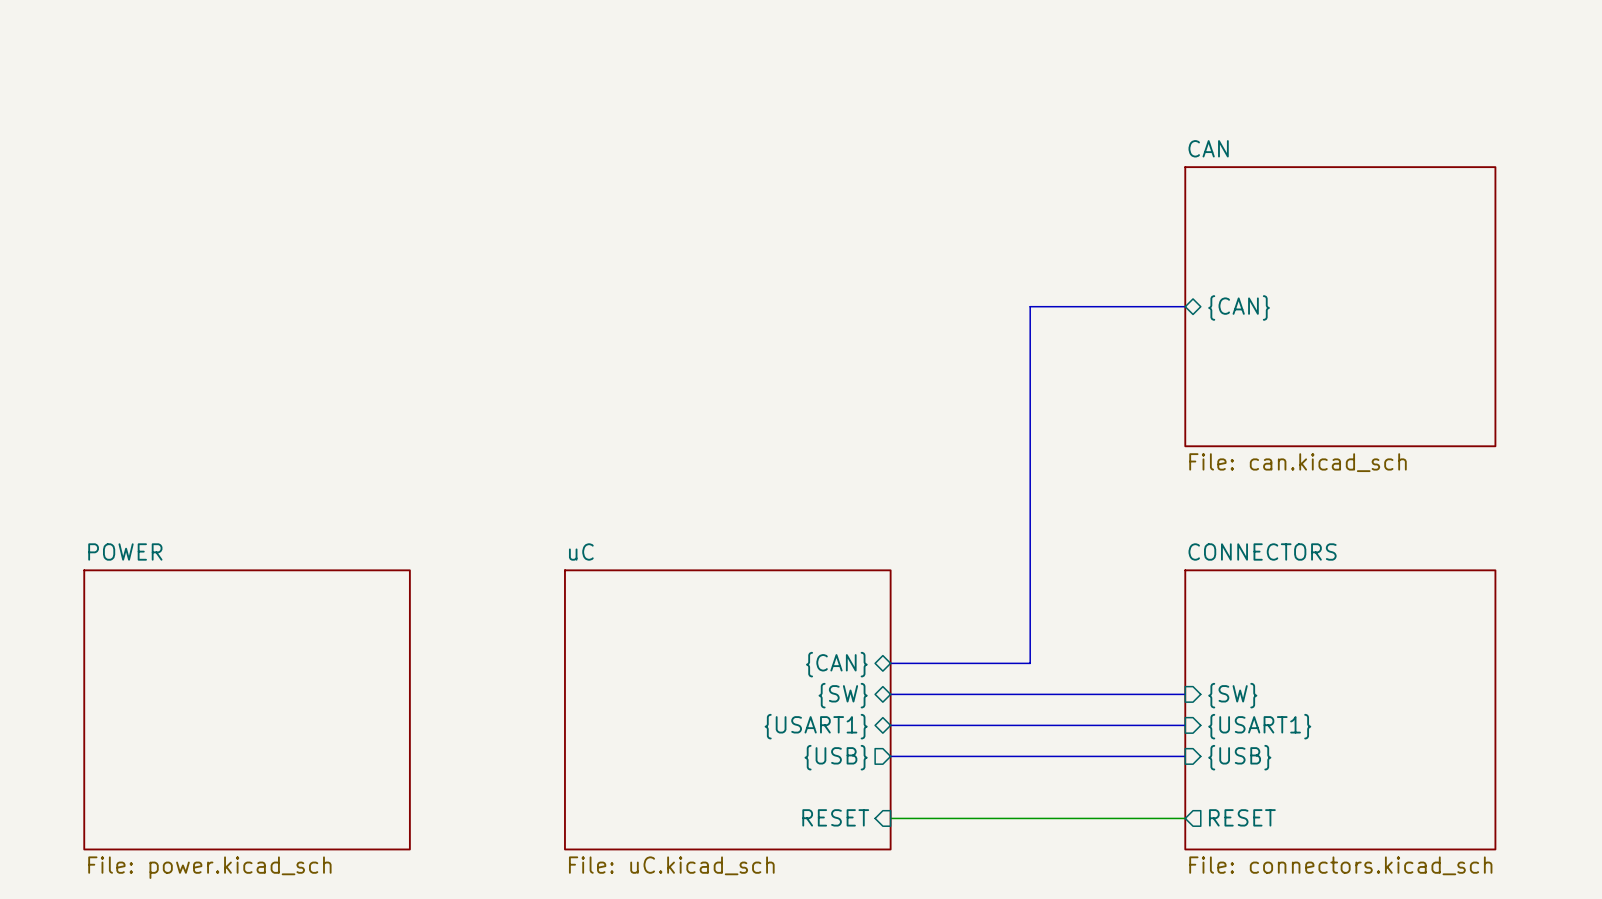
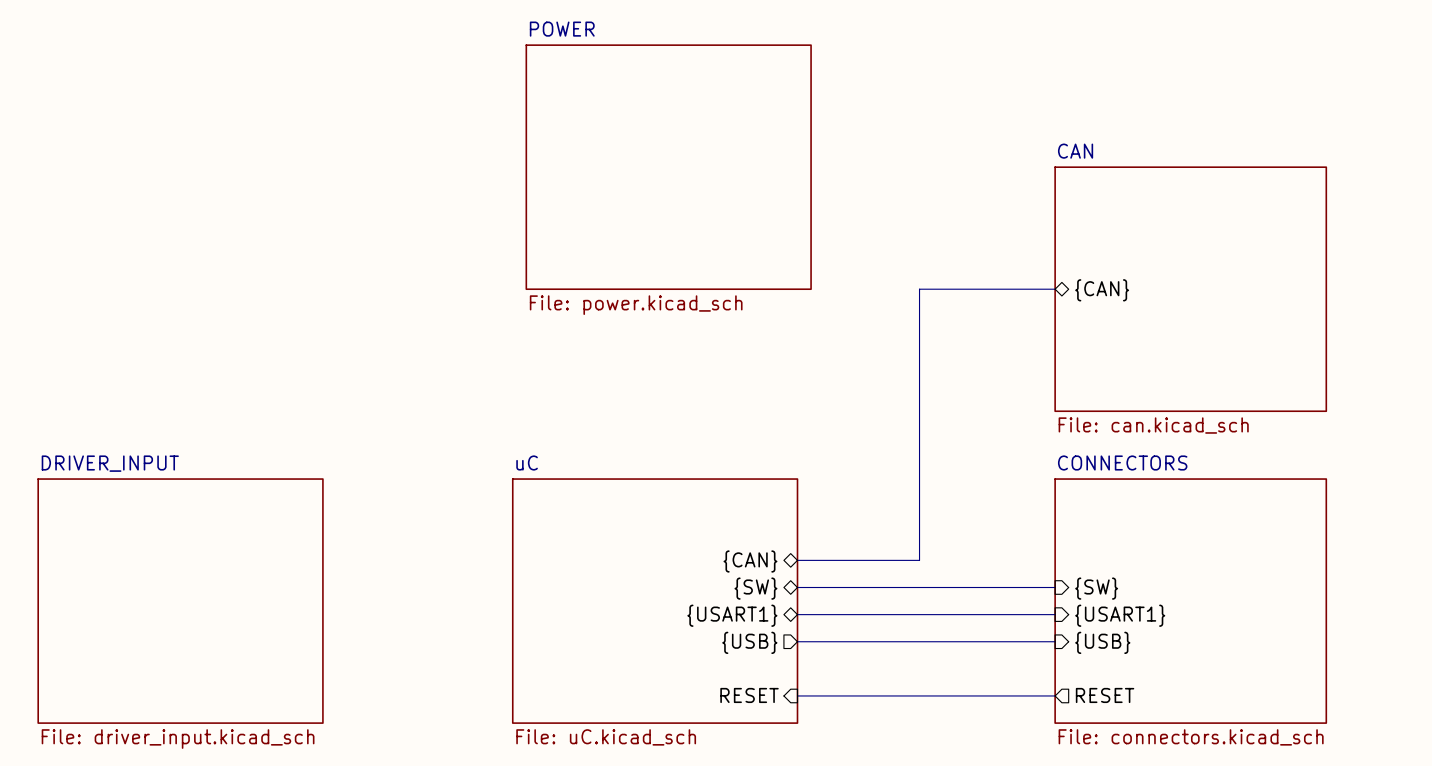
sheet POWER: none -> File: power.kicad_sch (668, 167)
bus: (1185, 306) (1030, 306) (1030, 353) -> (1055, 289) (919, 289)
sheet CAN position: (1340, 306) -> (1190, 289)
sheet pin position: {CAN} (1239, 307) -> {CAN} (1102, 290)
sheet DRIVER_INPUT: none -> File: driver_input.kicad_sch (180, 601)
sheet POWER: File: power.kicad_sch (247, 709) -> none

